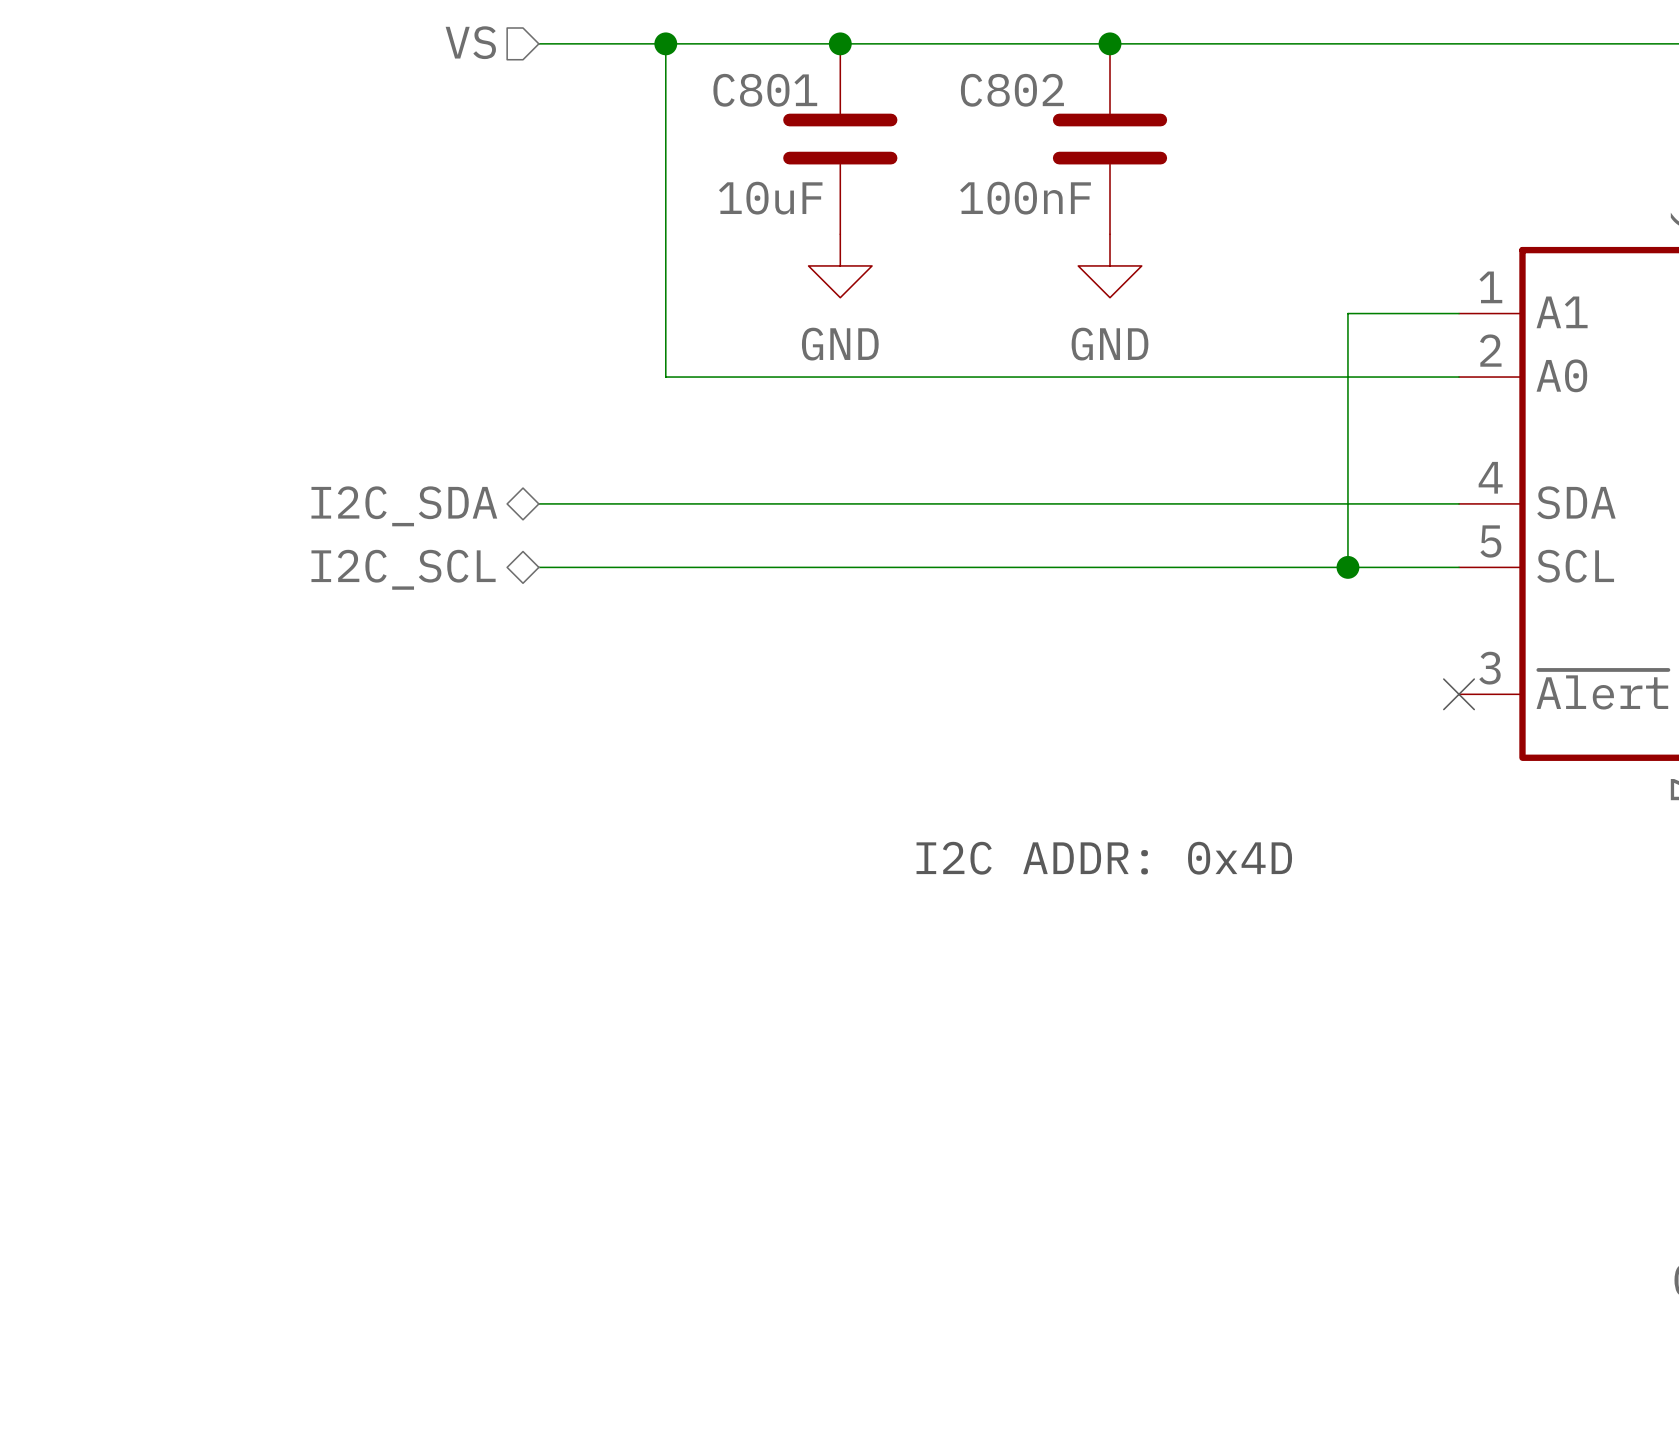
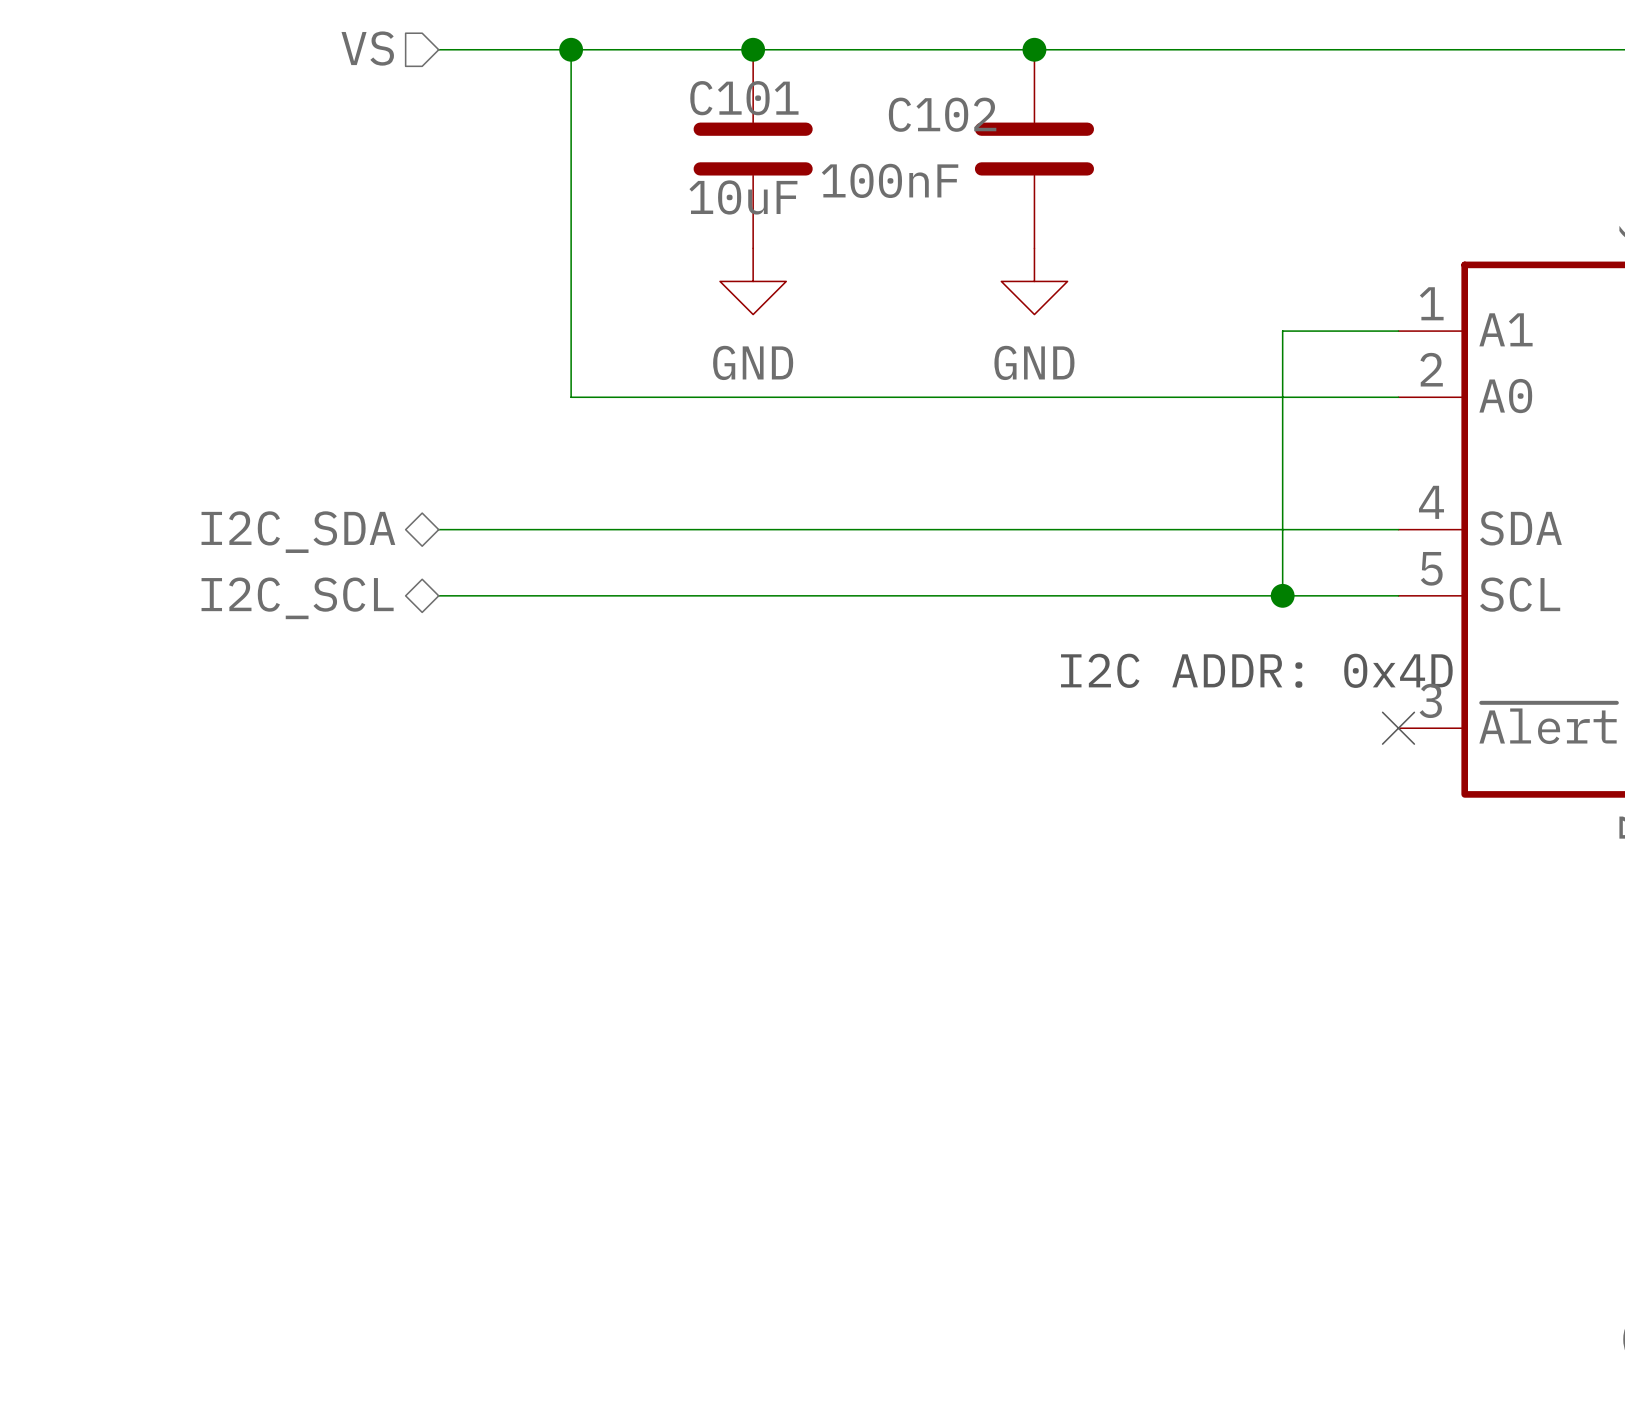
C801 name: C801 (765, 90) -> C101 (744, 98)
C802 name: C802 (1012, 90) -> C102 (942, 114)
C801 value position: 10uF (770, 198) -> 10uF (743, 197)
C802 value position: 100nF (1025, 198) -> 100nF (890, 180)
text position: I2C ADDR: 0x4D (1104, 858) -> I2C ADDR: 0x4D (1256, 670)

